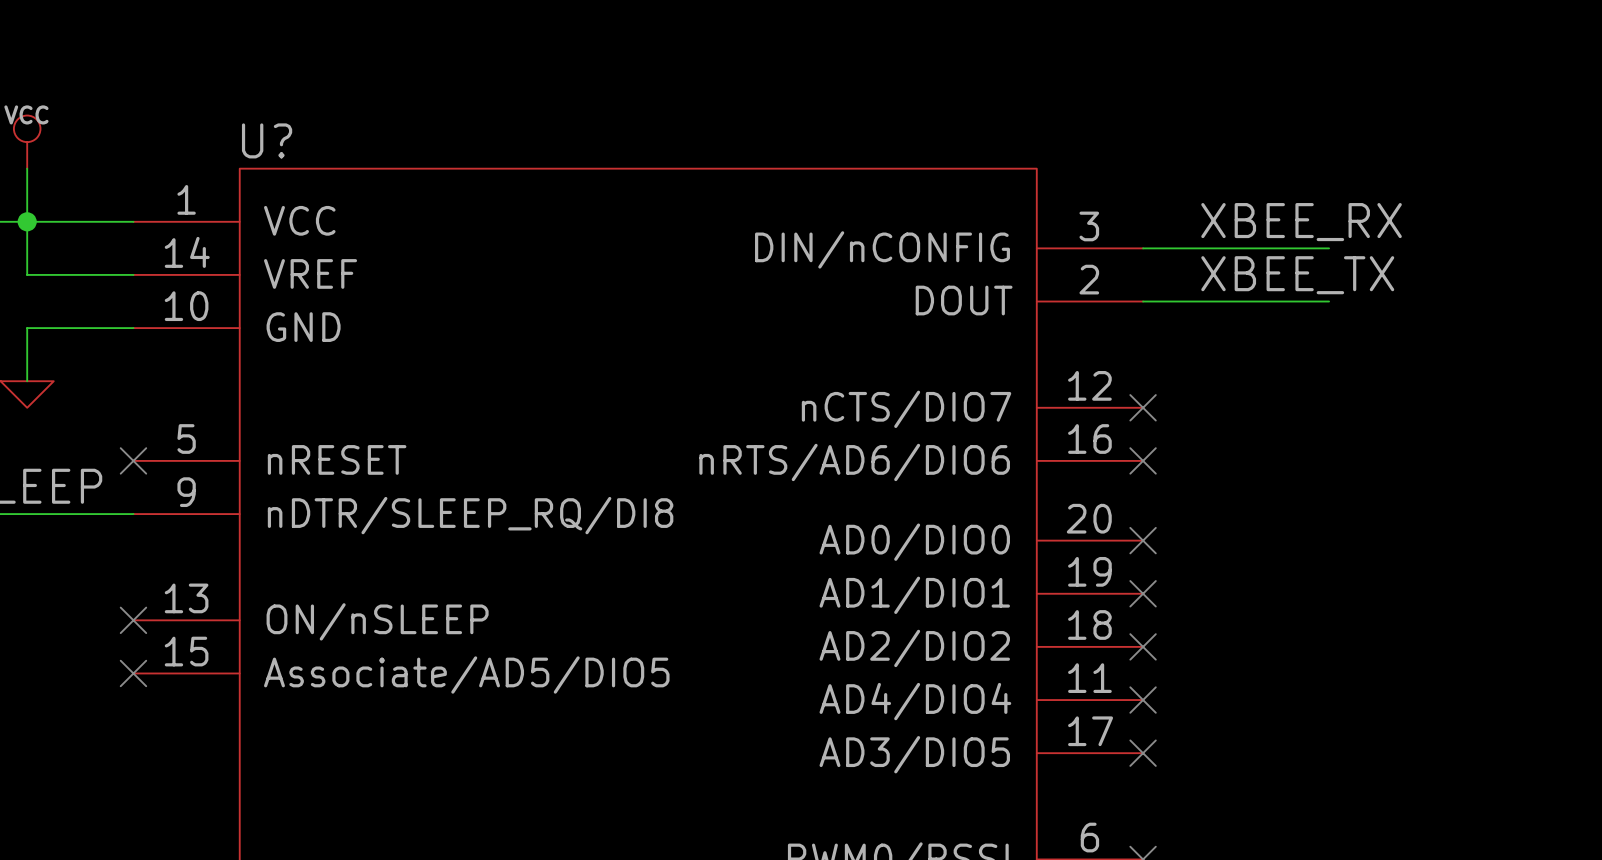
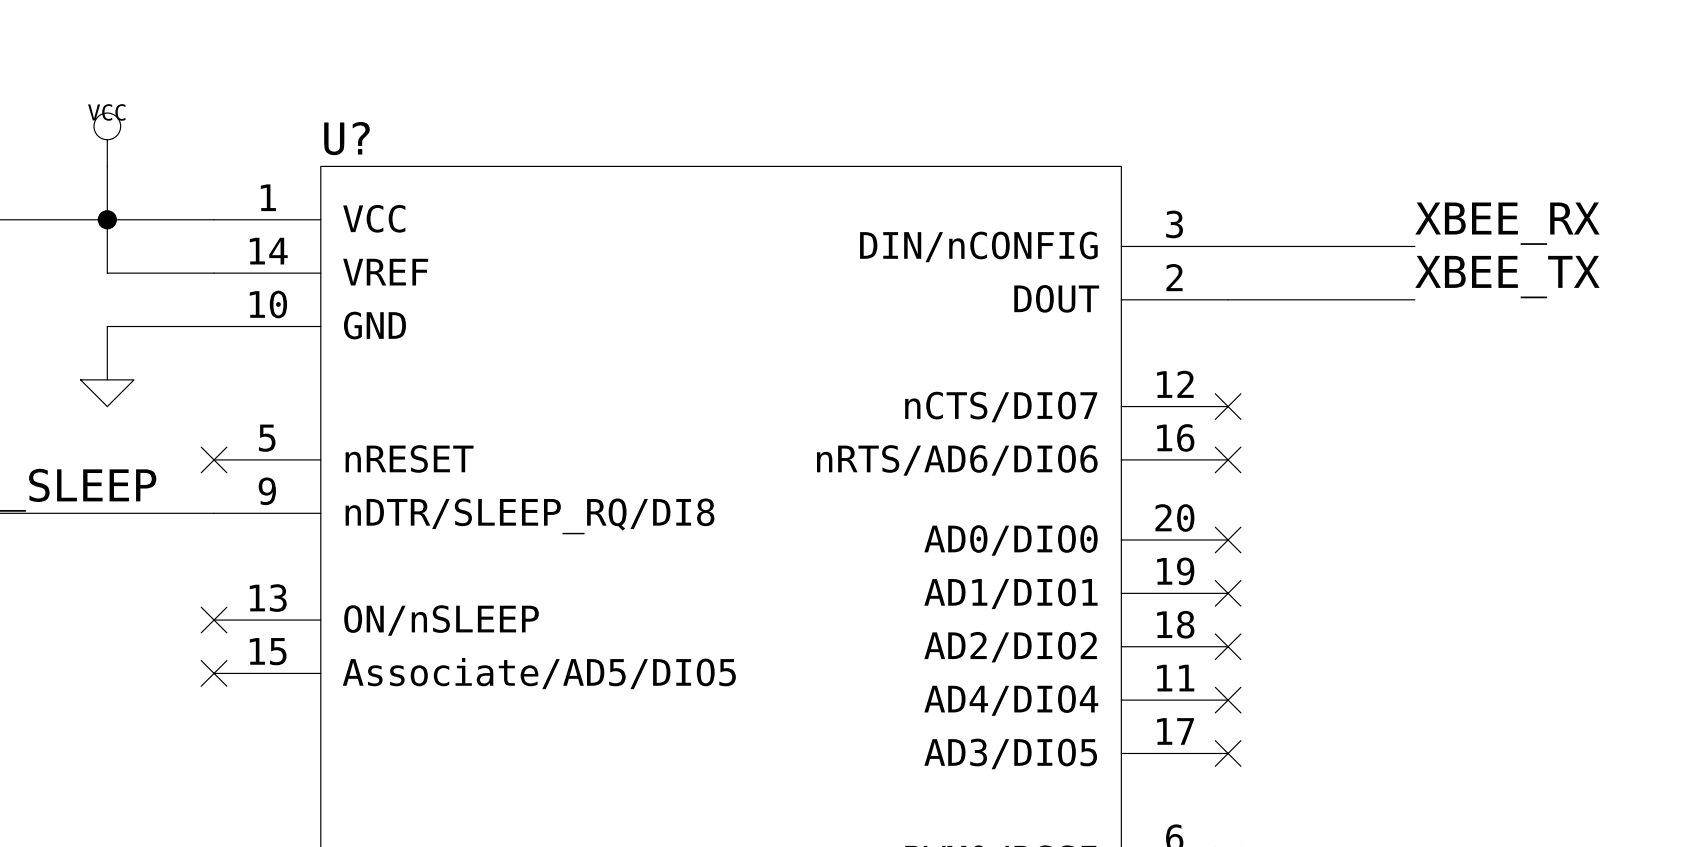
label position: XBEE_RX (1301, 222) -> XBEE_RX (1507, 223)
label position: XBEE_TX (1297, 275) -> XBEE_TX (1507, 277)

